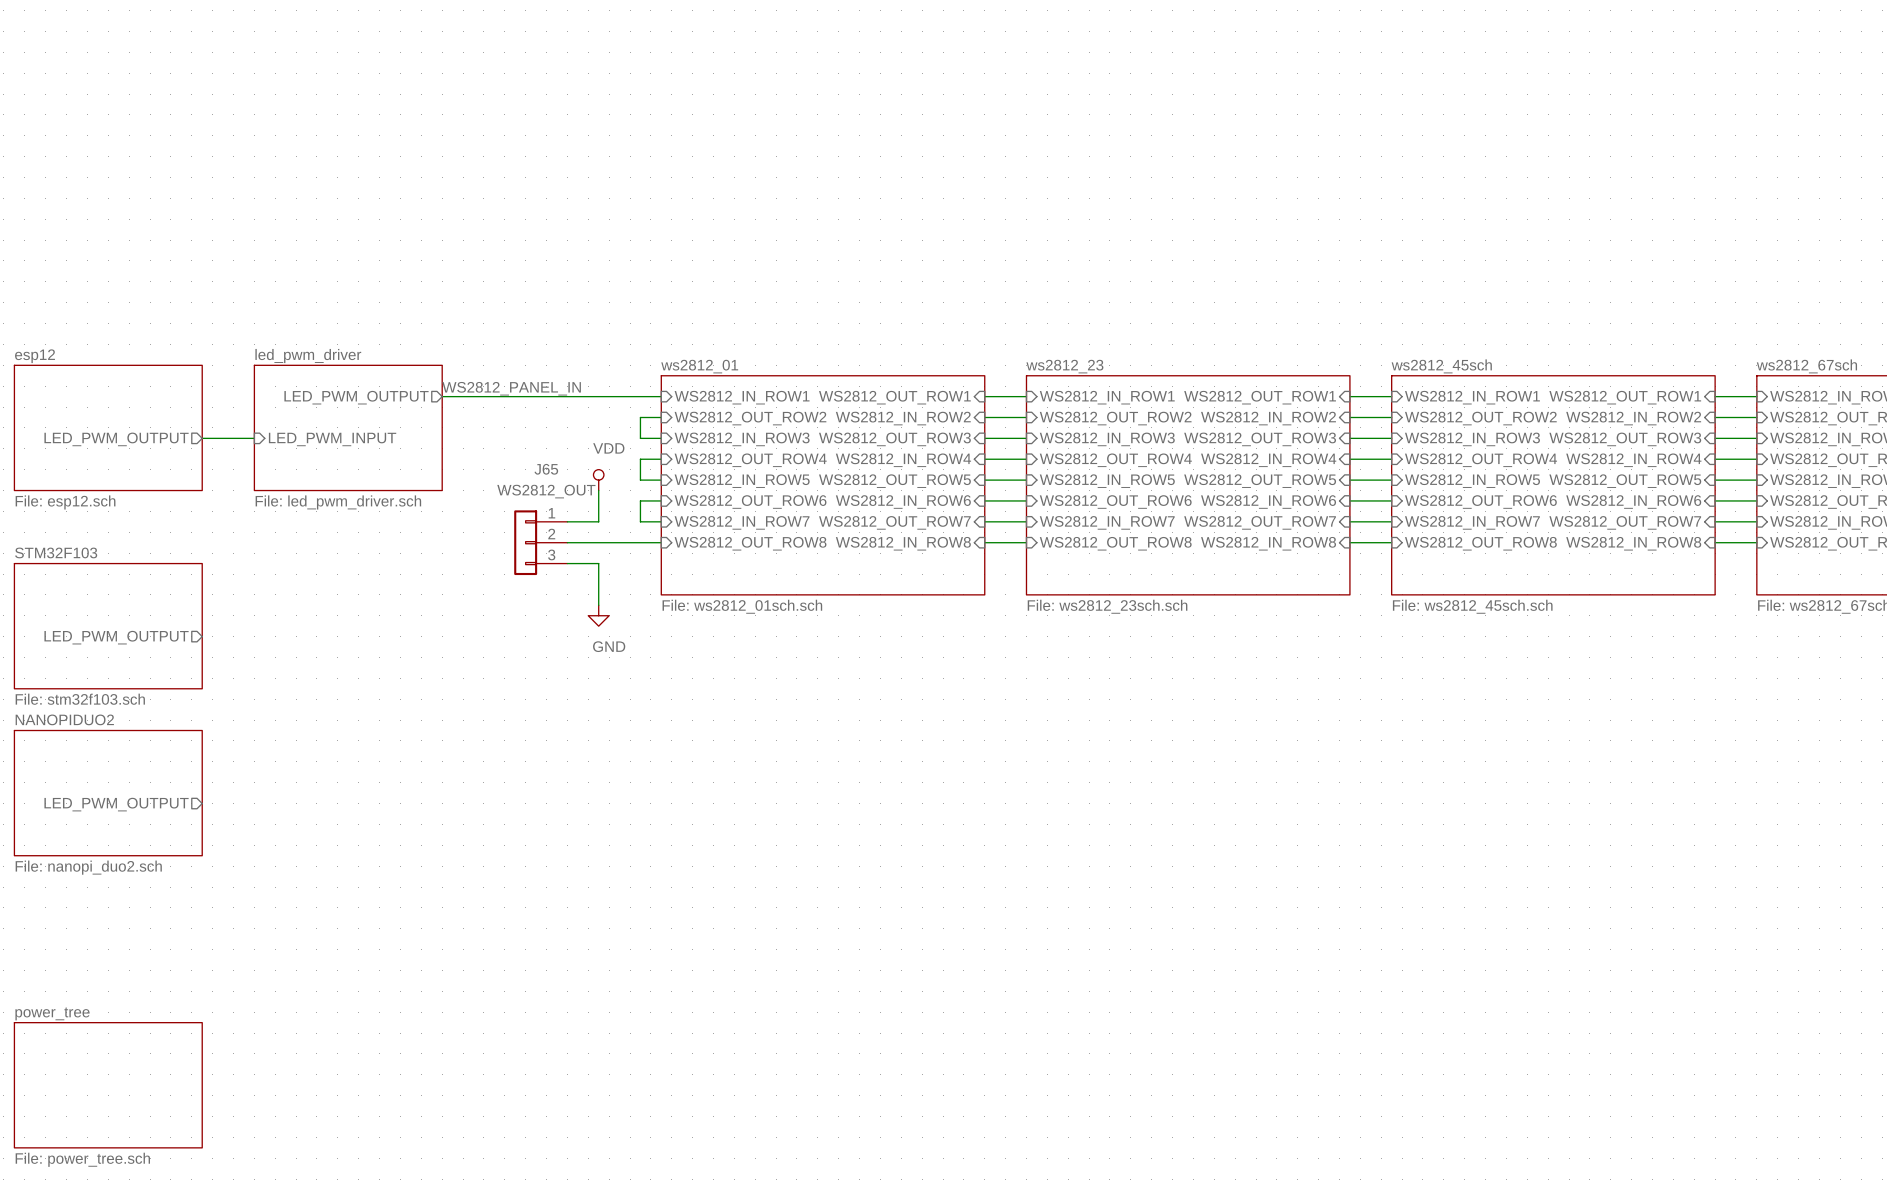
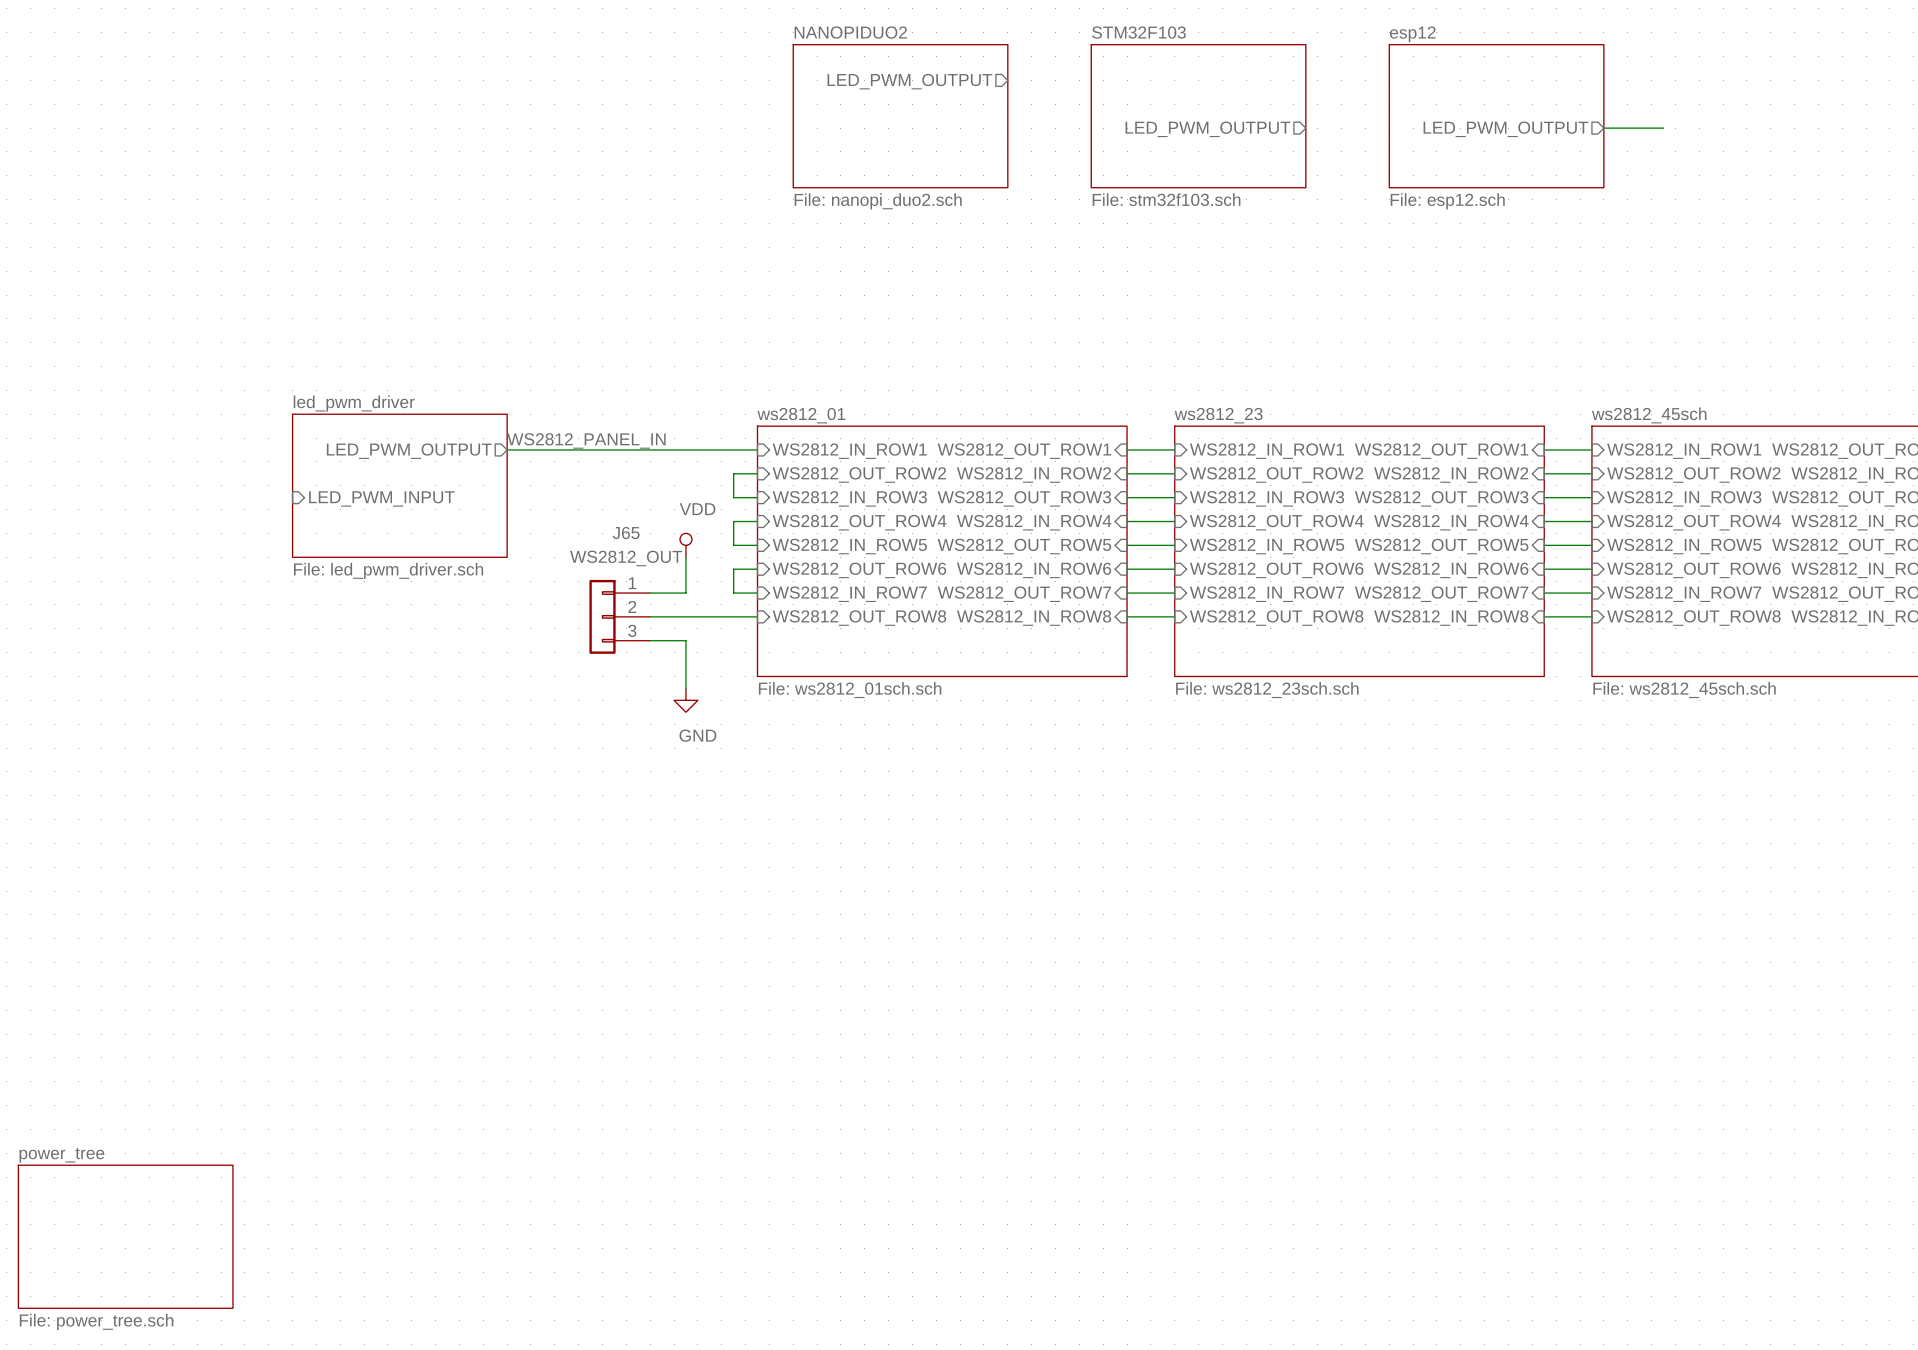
sheet pin: none -> LED_PWM_OUTPUT (909, 81)
wire: none -> (1603, 128) (1663, 128)
sheet pin: none -> LED_PWM_OUTPUT (1207, 129)
sheet pin: none -> LED_PWM_OUTPUT (1505, 129)
sheet esp12 position: (108, 427) -> (1496, 116)
wire: (202, 438) (254, 438) -> none
sheet pin: LED_PWM_OUTPUT (116, 439) -> none
sheet STM32F103 position: (108, 626) -> (1198, 116)
sheet pin: LED_PWM_OUTPUT (116, 637) -> none
sheet NANOPIDUO2 position: (108, 793) -> (900, 116)
sheet pin: LED_PWM_OUTPUT (116, 804) -> none

